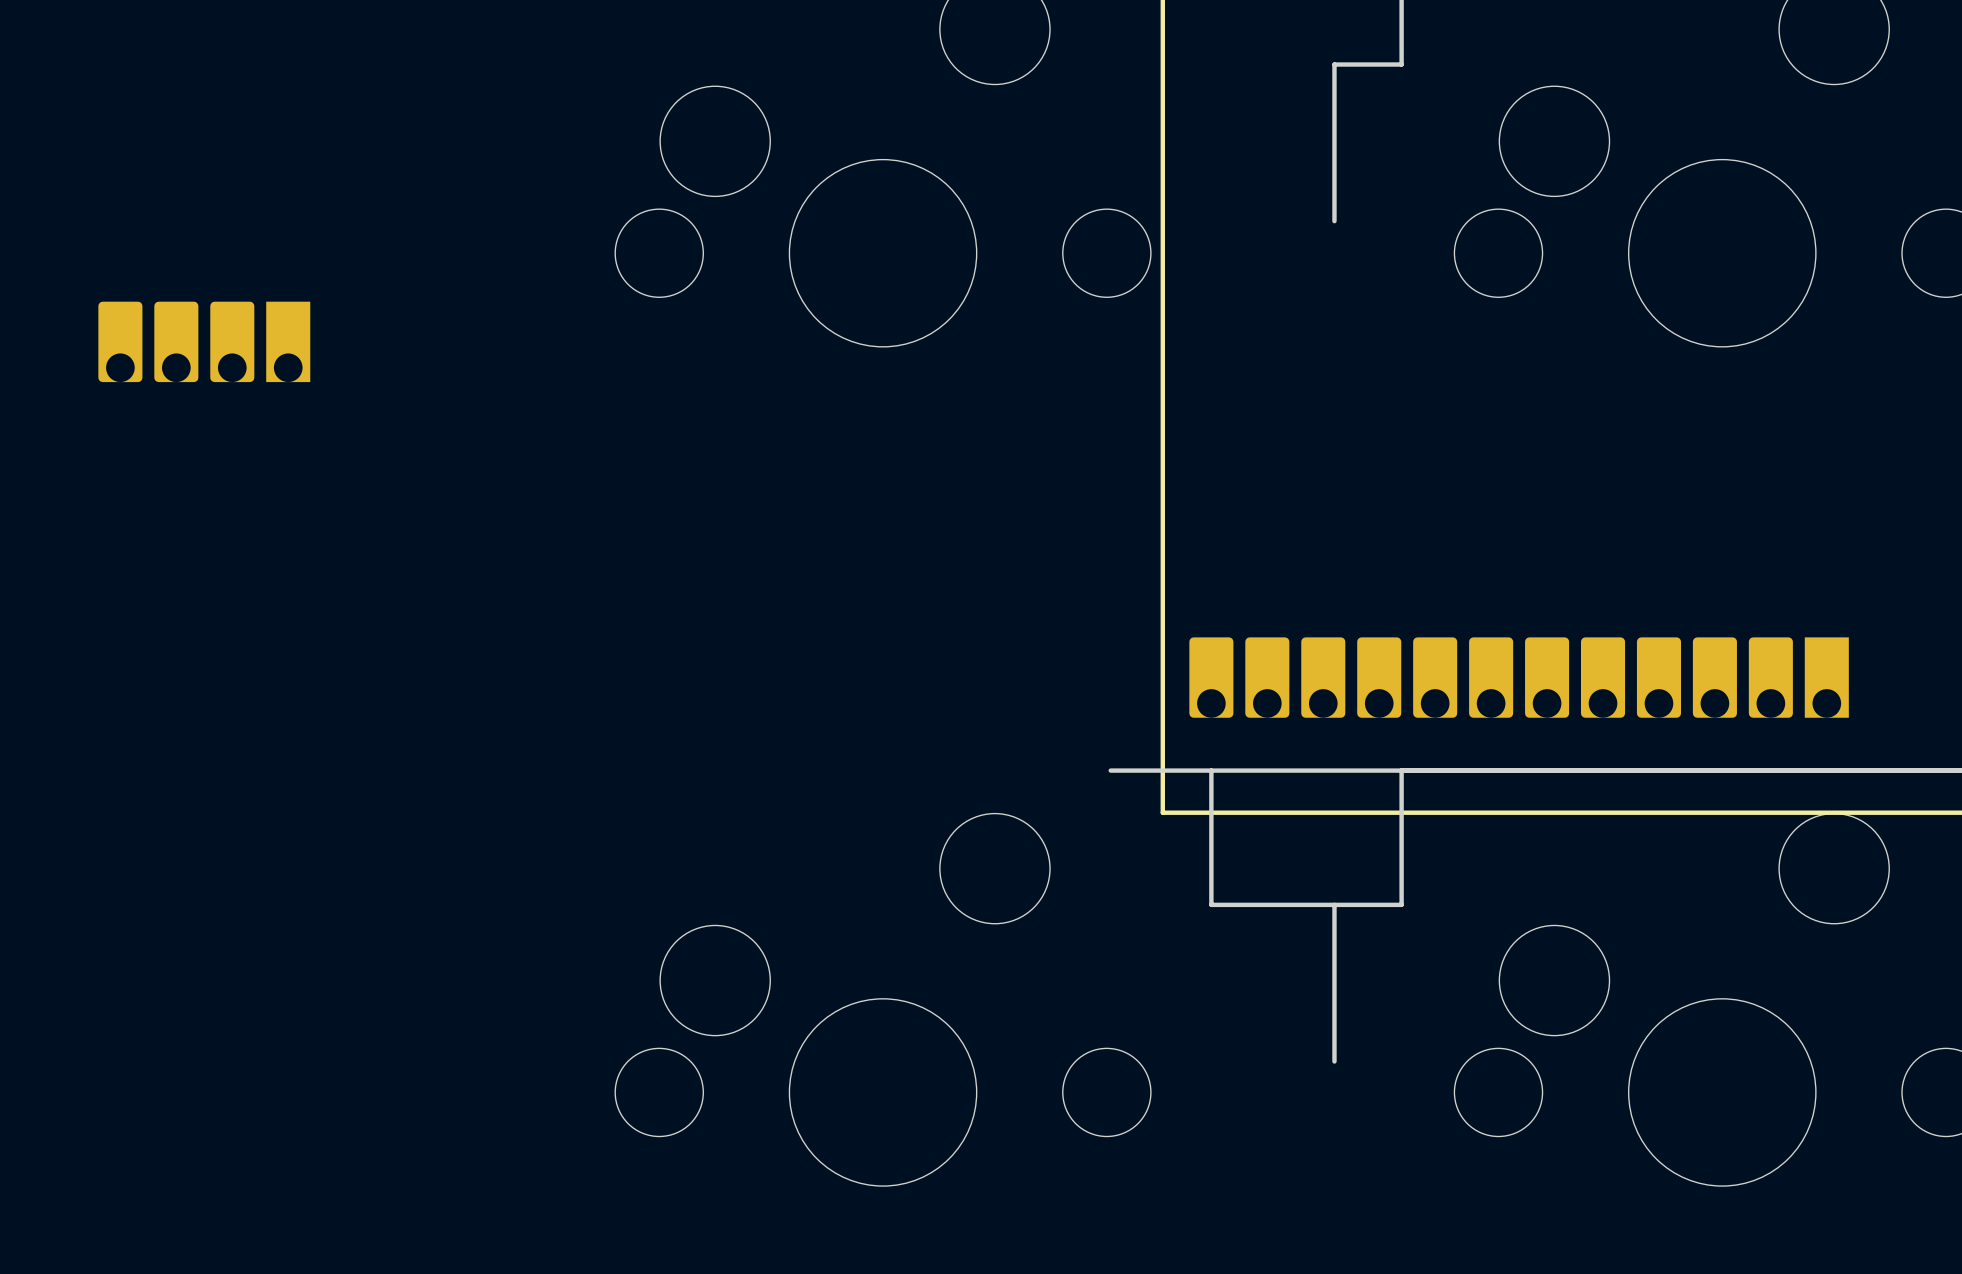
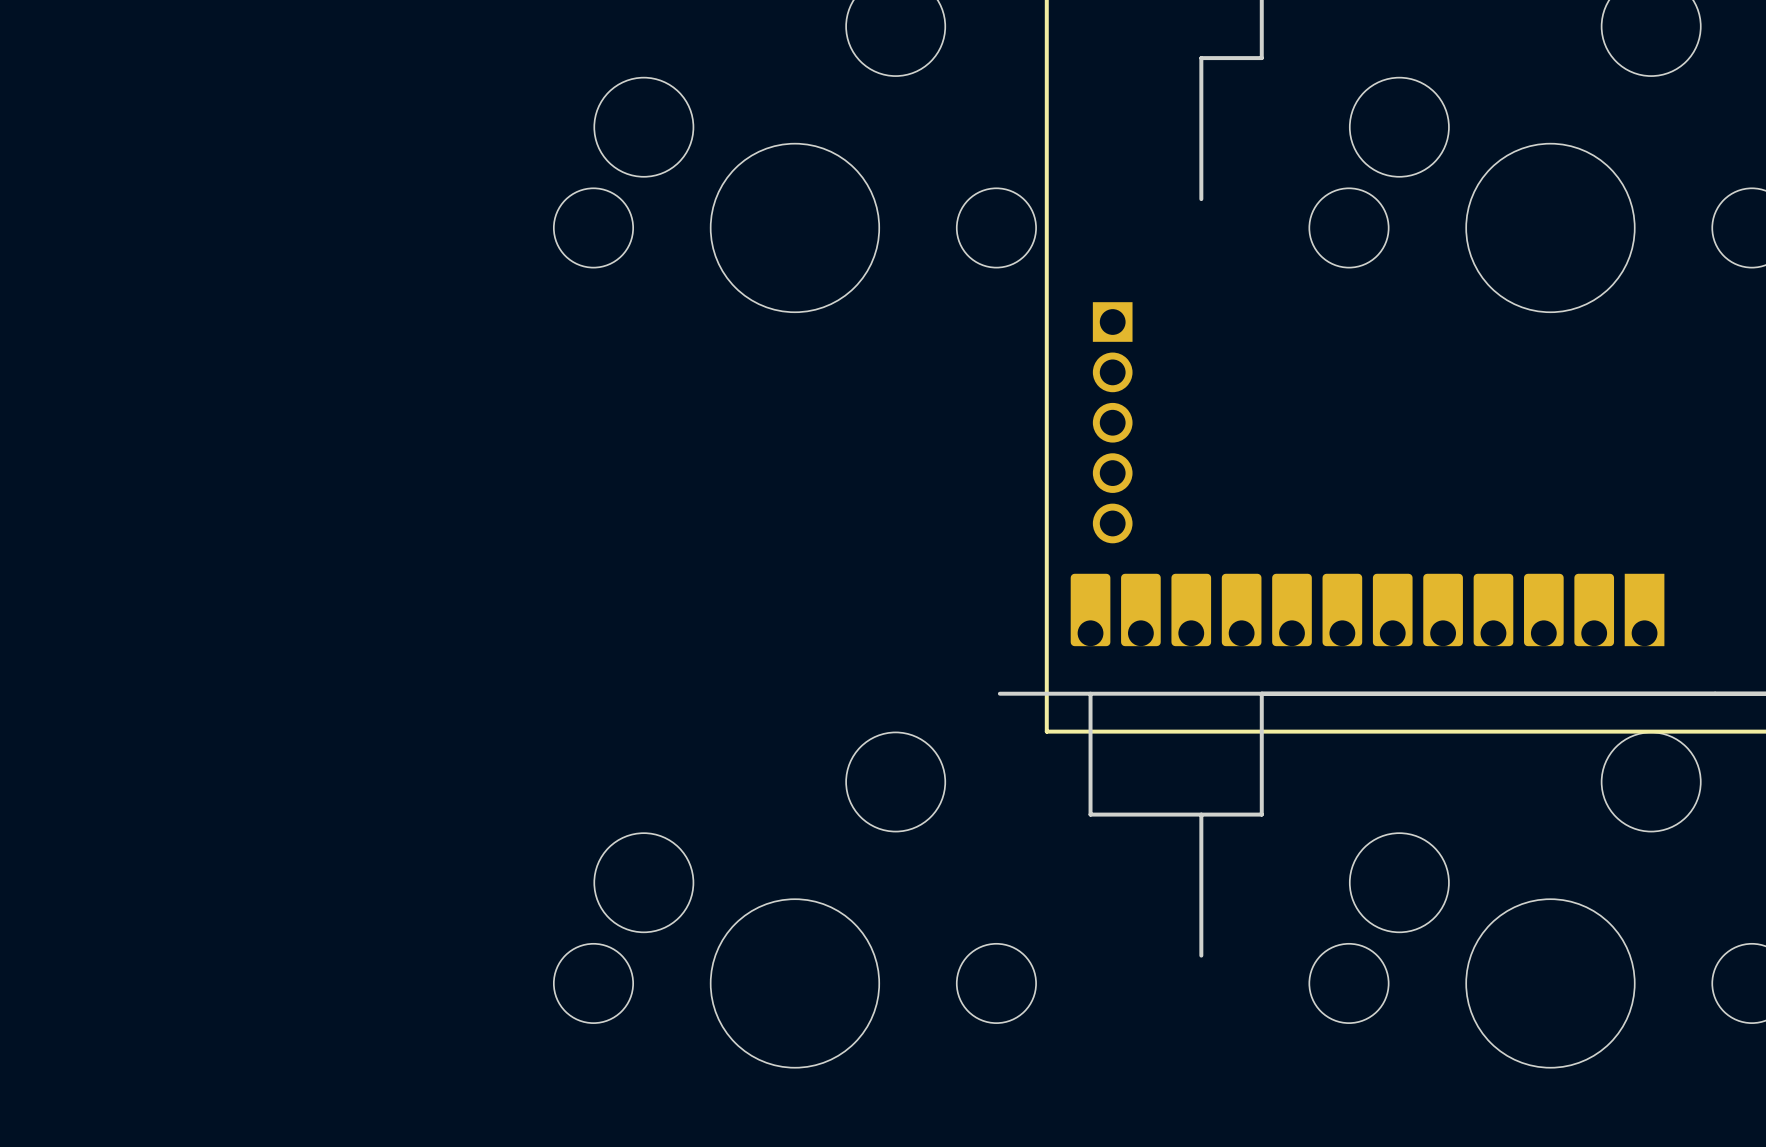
part: (204, 341) -> none
part: none -> (1112, 422)

